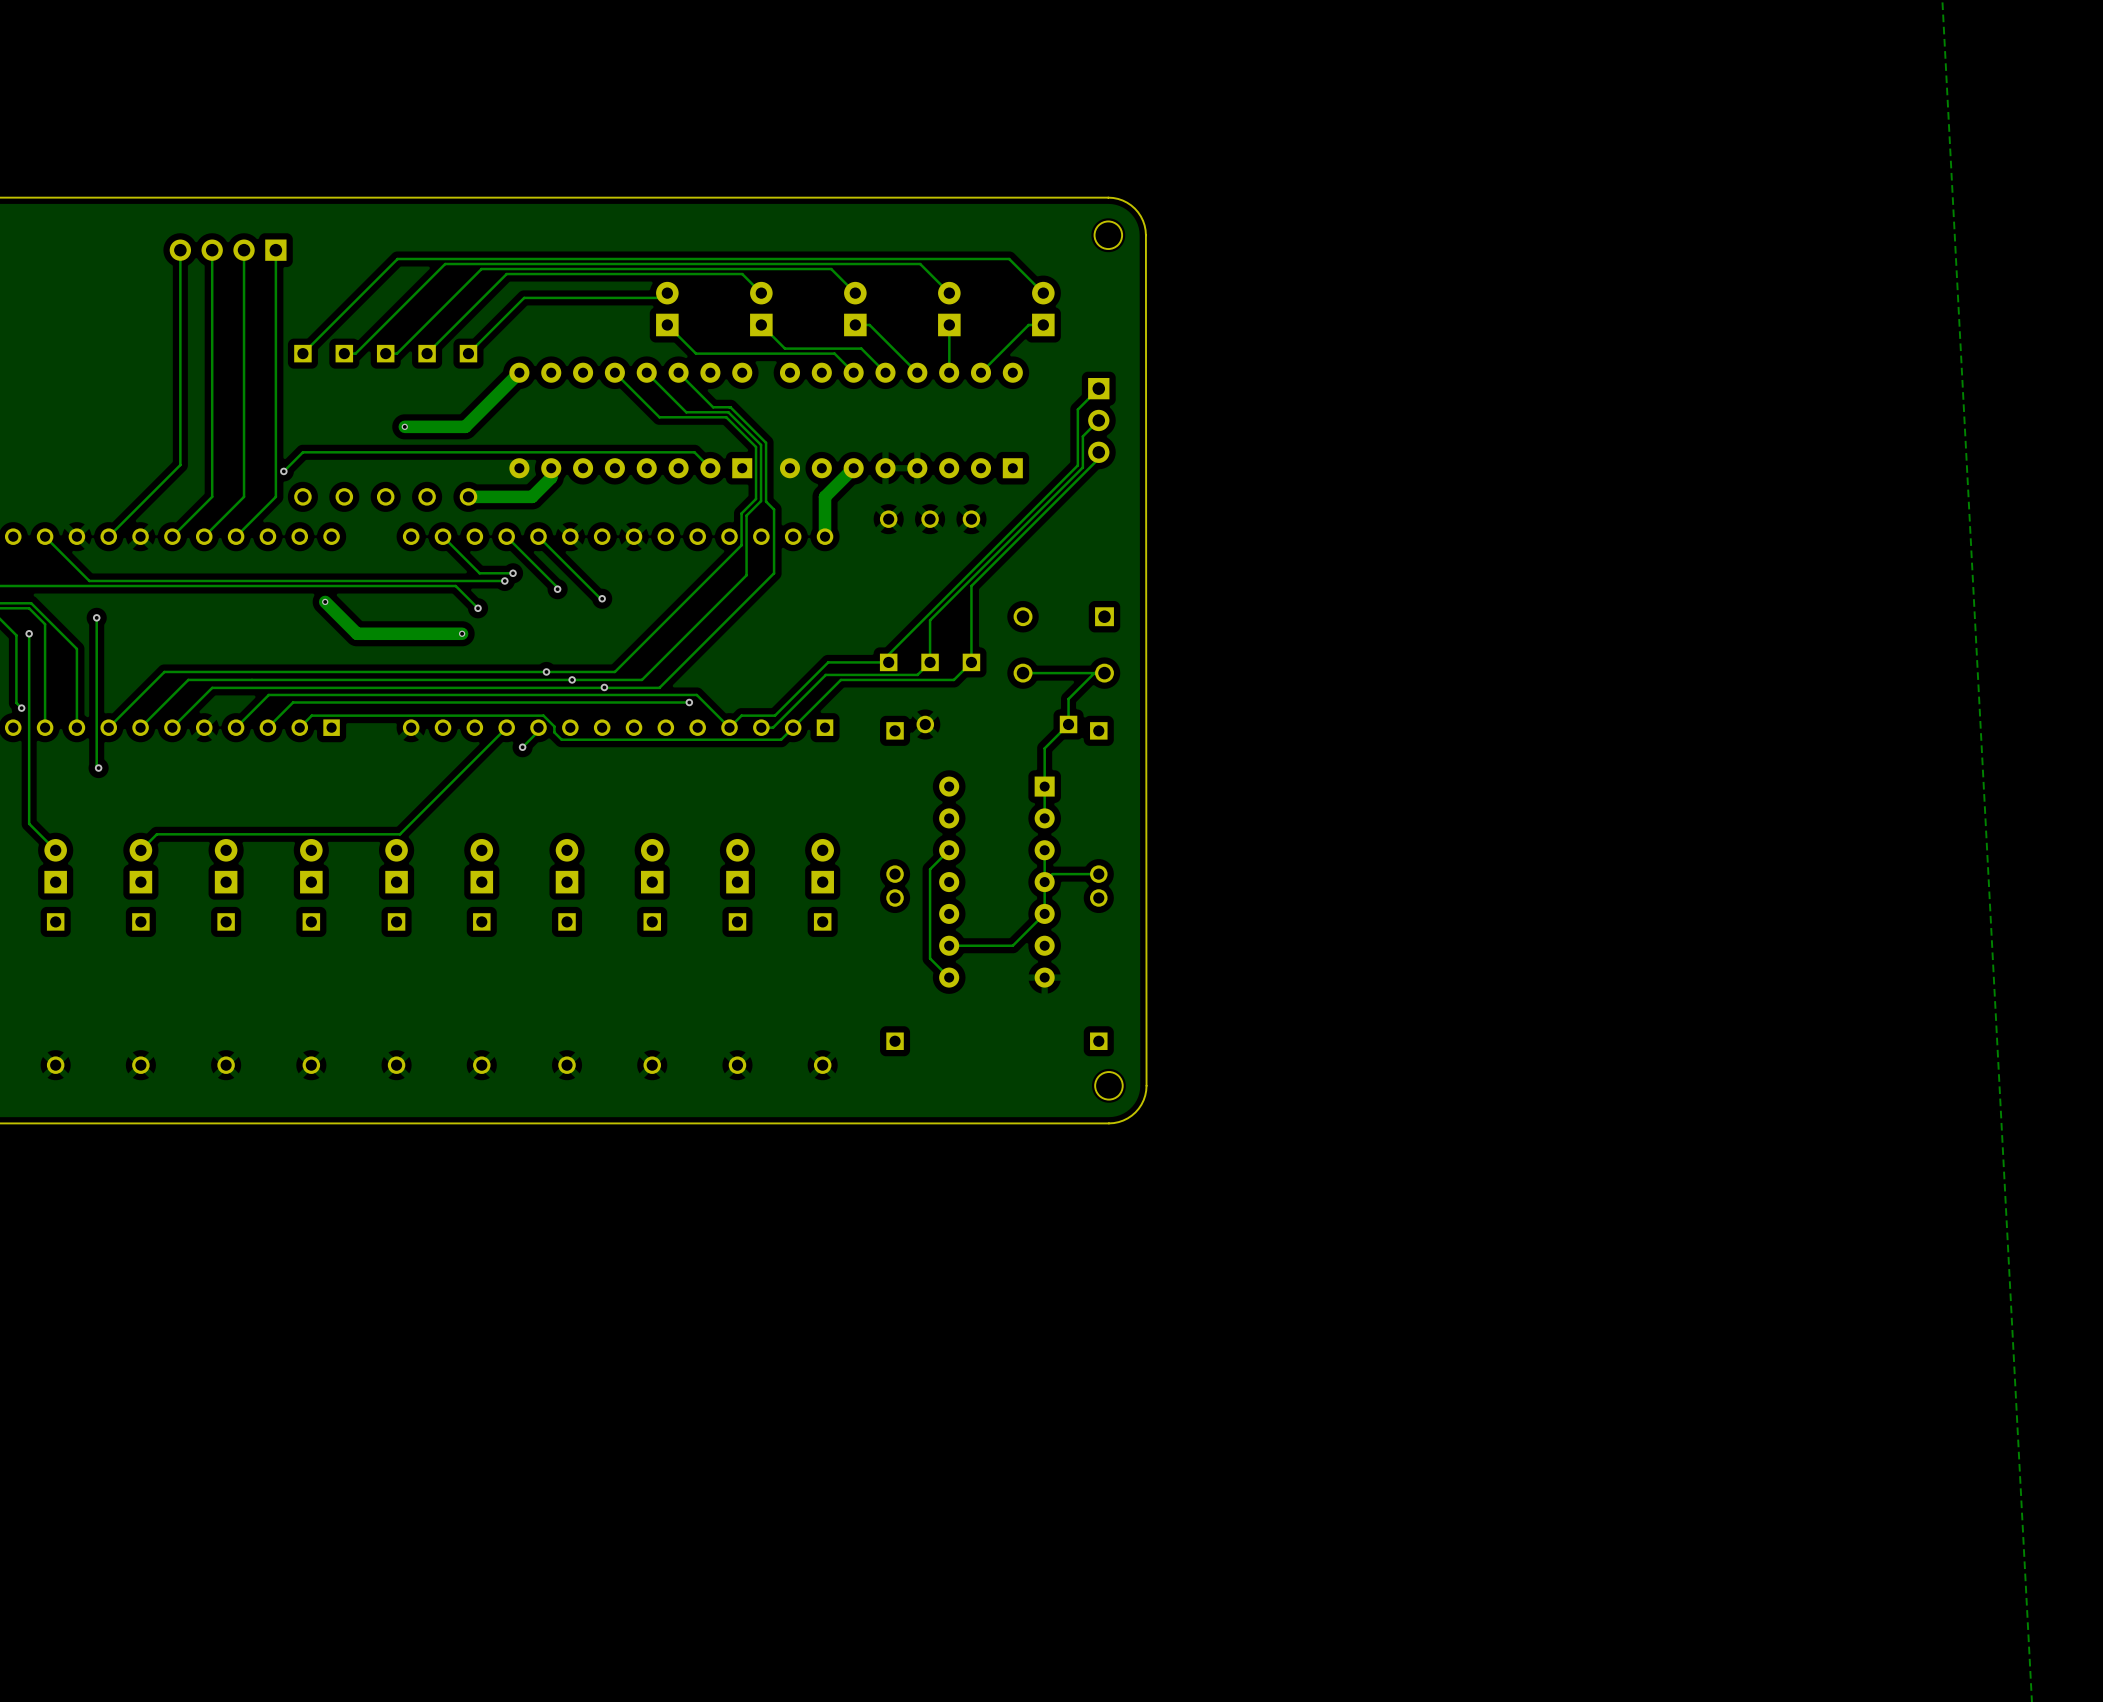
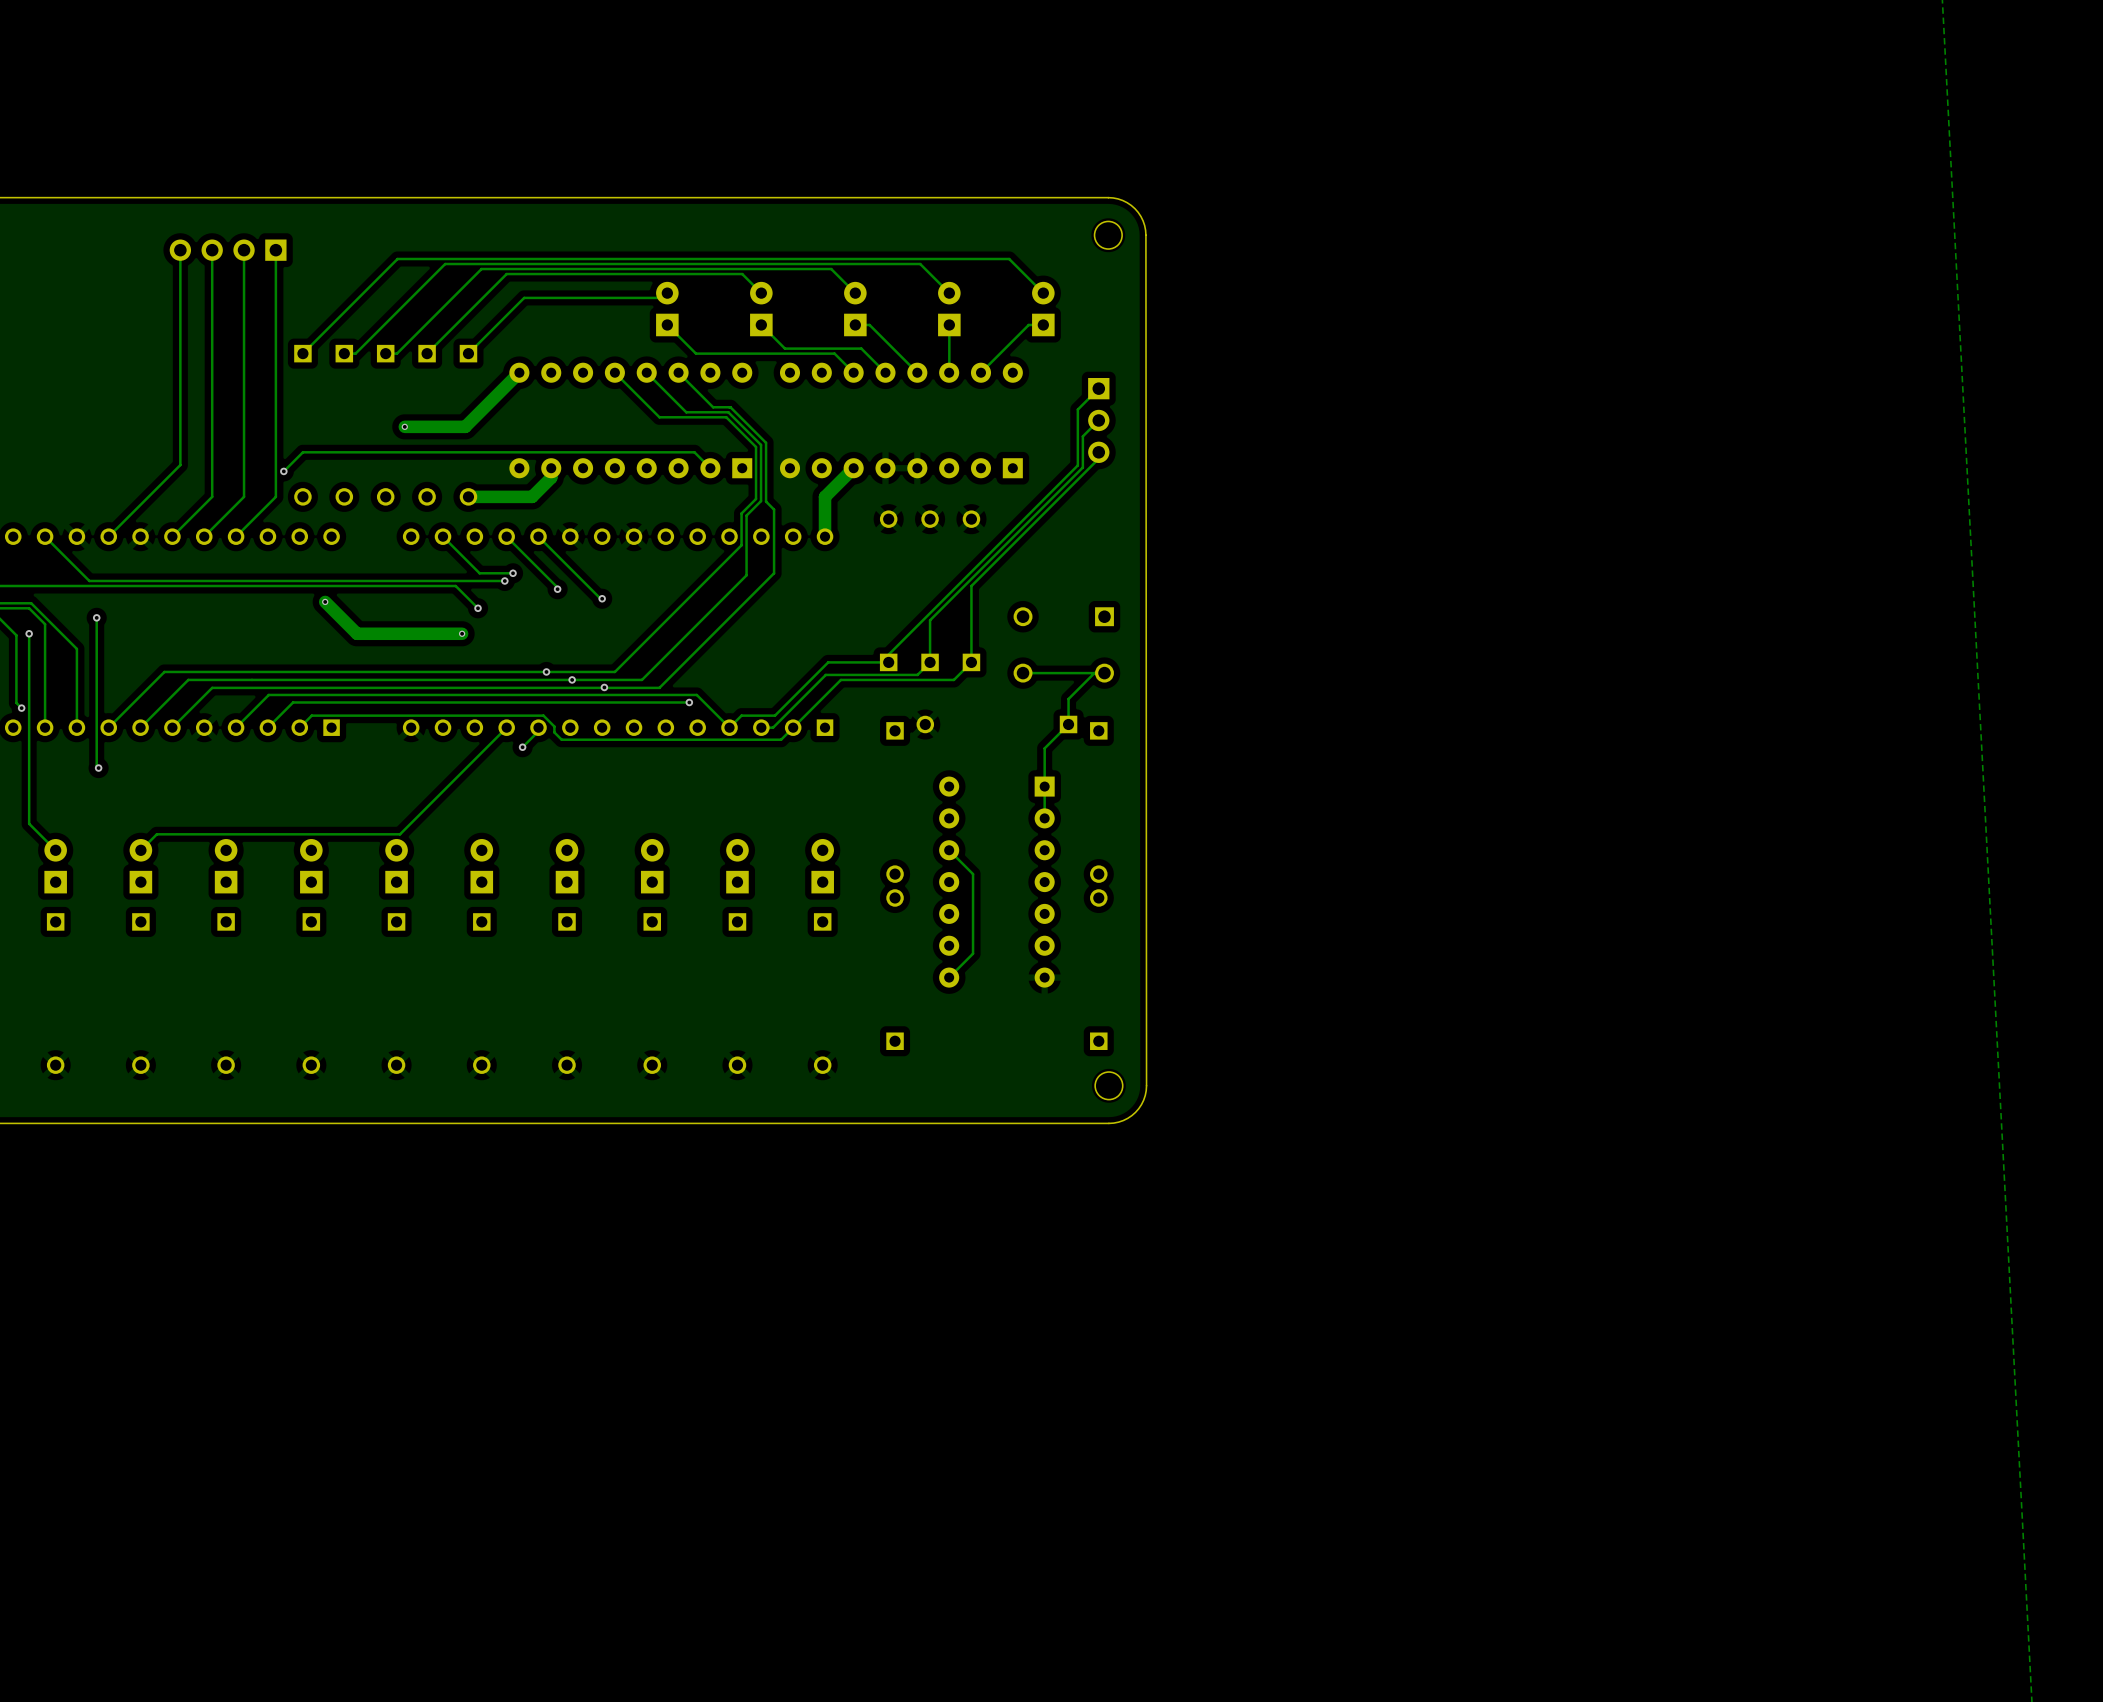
track: (949, 850) (930, 869) (930, 958) (949, 977) -> (949, 850) (973, 874) (973, 953) (949, 977)
track: (1044, 850) (1044, 913) (1012, 945) (949, 945) -> none
track: (1098, 874) (1052, 874) (1044, 882) -> none

